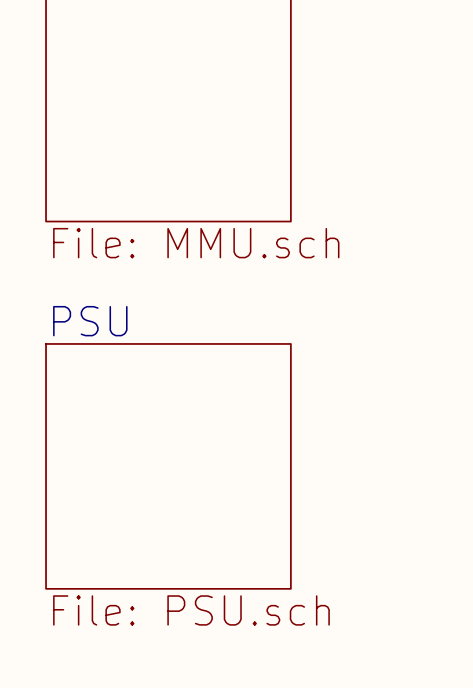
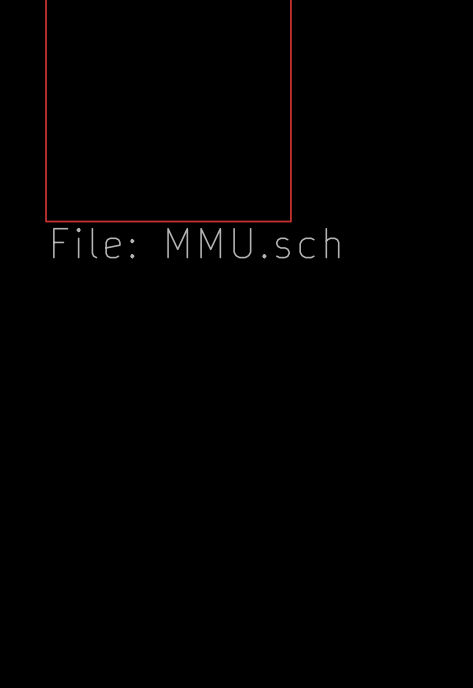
sheet PSU: File: PSU.sch (168, 466) -> none

